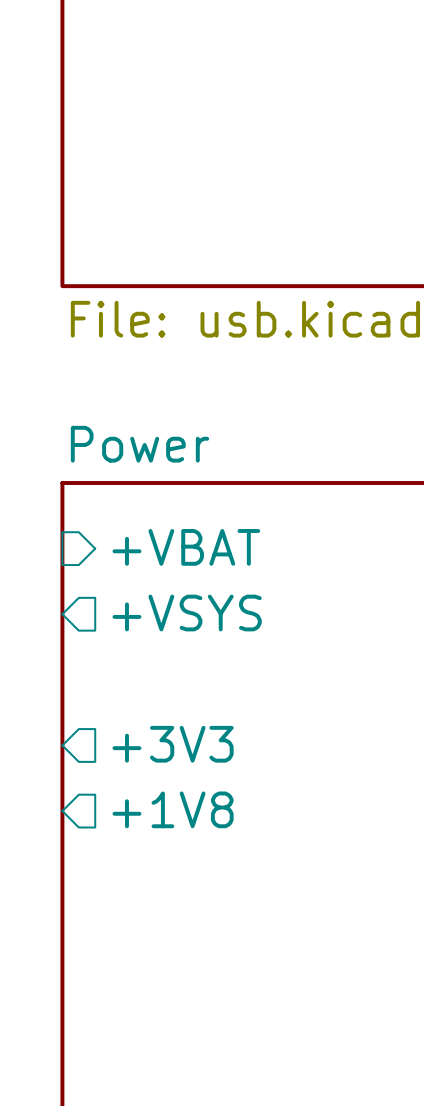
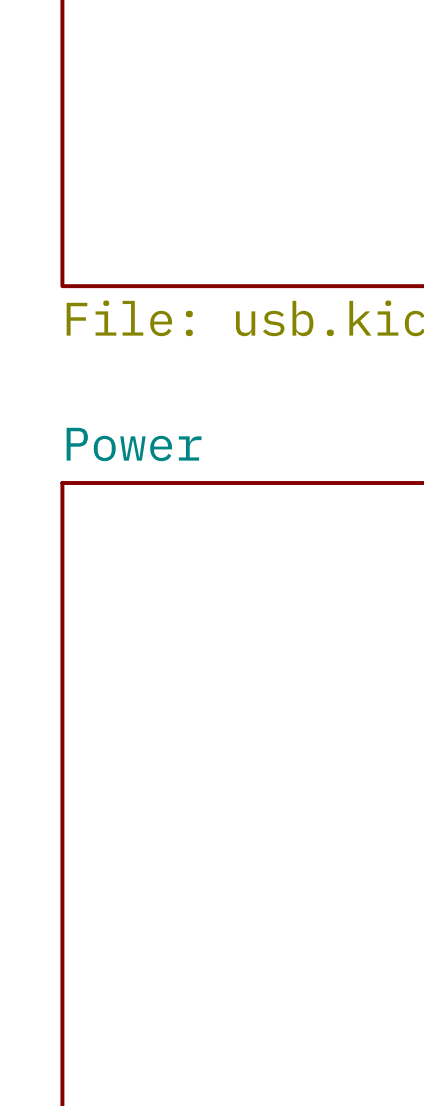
sheet pin: +VBAT (186, 547) -> none
sheet pin: +VSYS (187, 613) -> none
sheet pin: +3V3 (173, 744) -> none
sheet pin: +1V8 (173, 809) -> none

